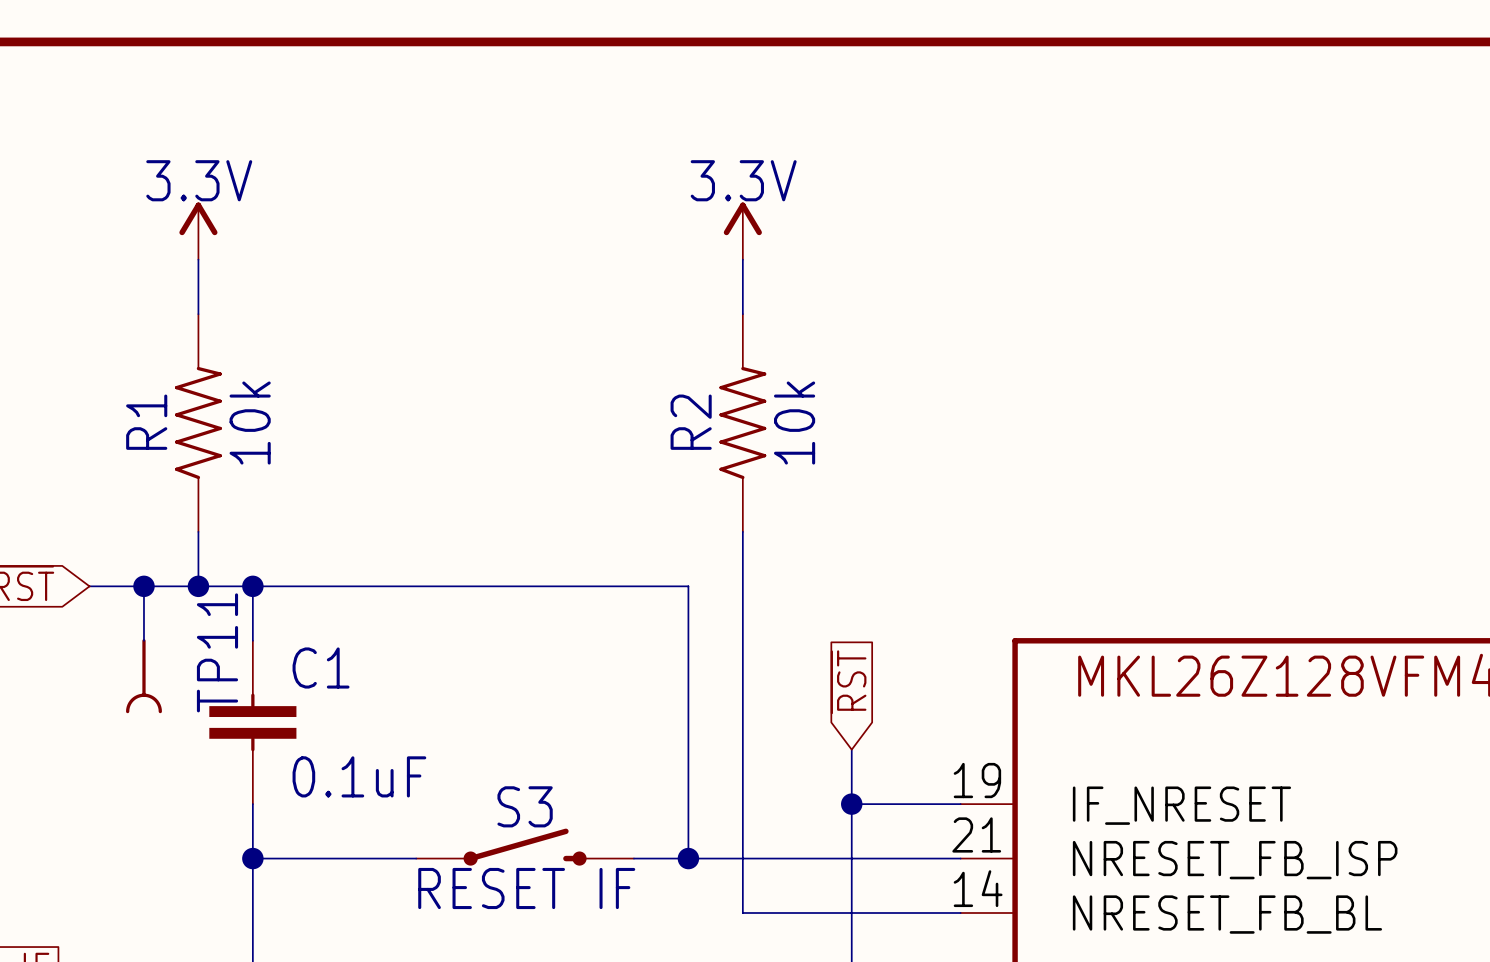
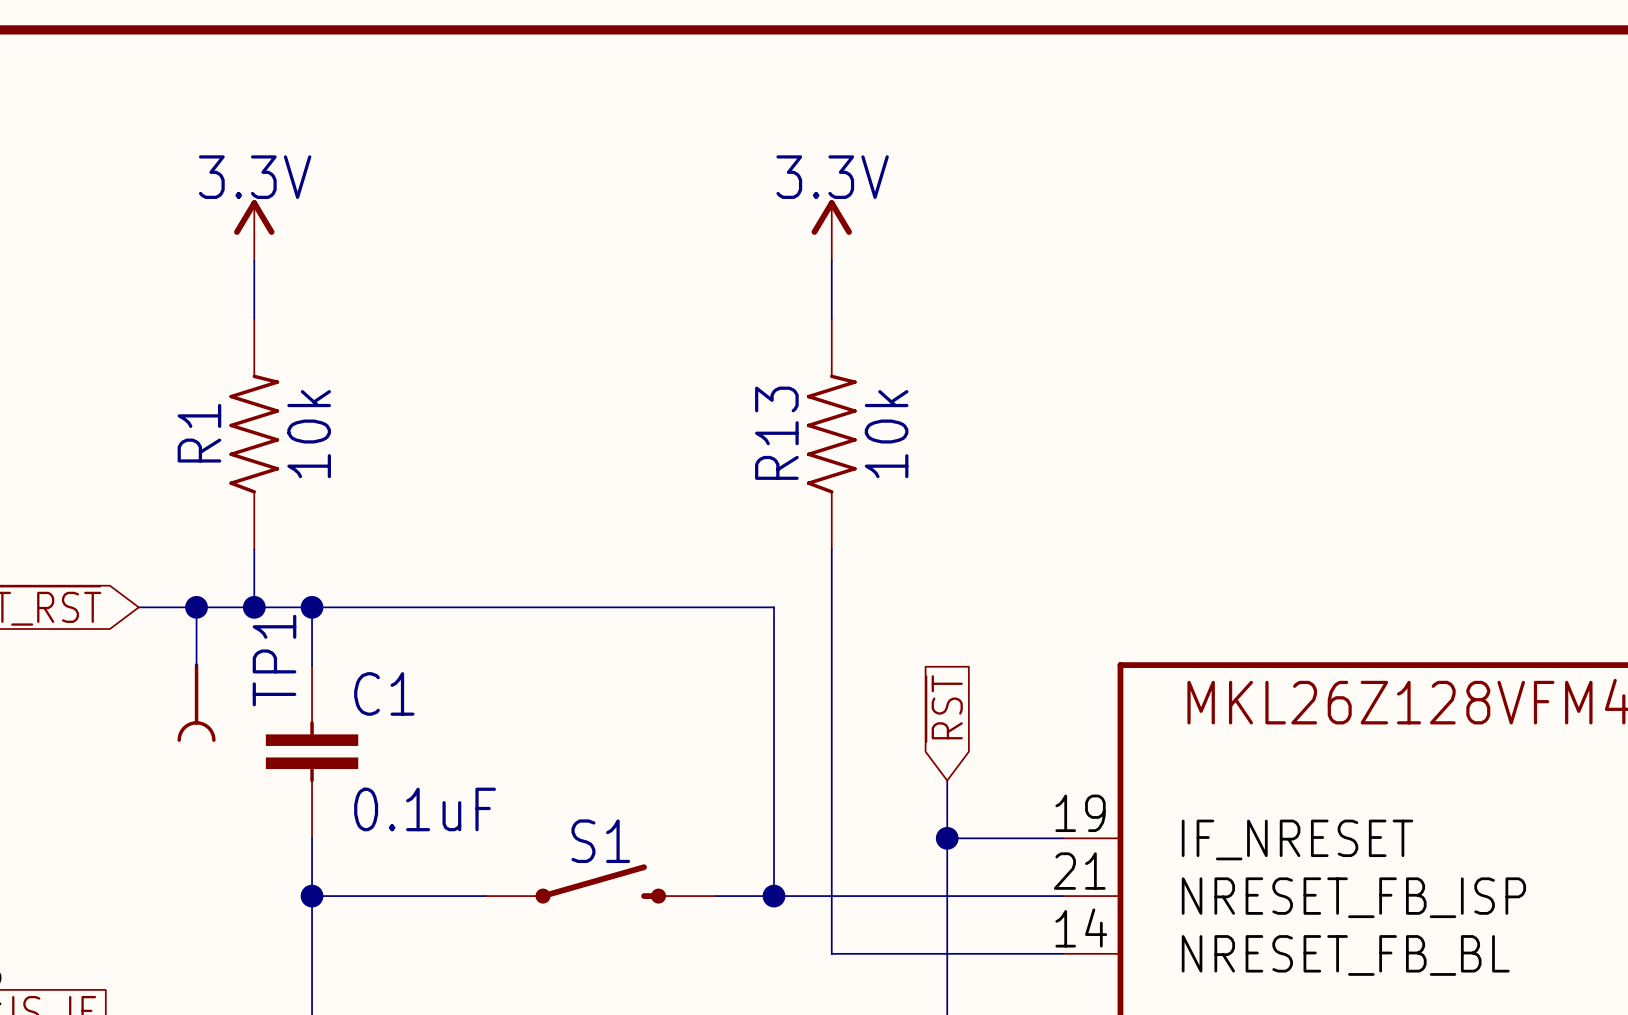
R2 name: R2 (691, 422) -> R13 (776, 433)
TP11 name: TP11 (217, 652) -> TP1 (274, 660)
S3 name: S3 (525, 806) -> S1 (600, 841)
S3 value: RESET IF (526, 888) -> none

